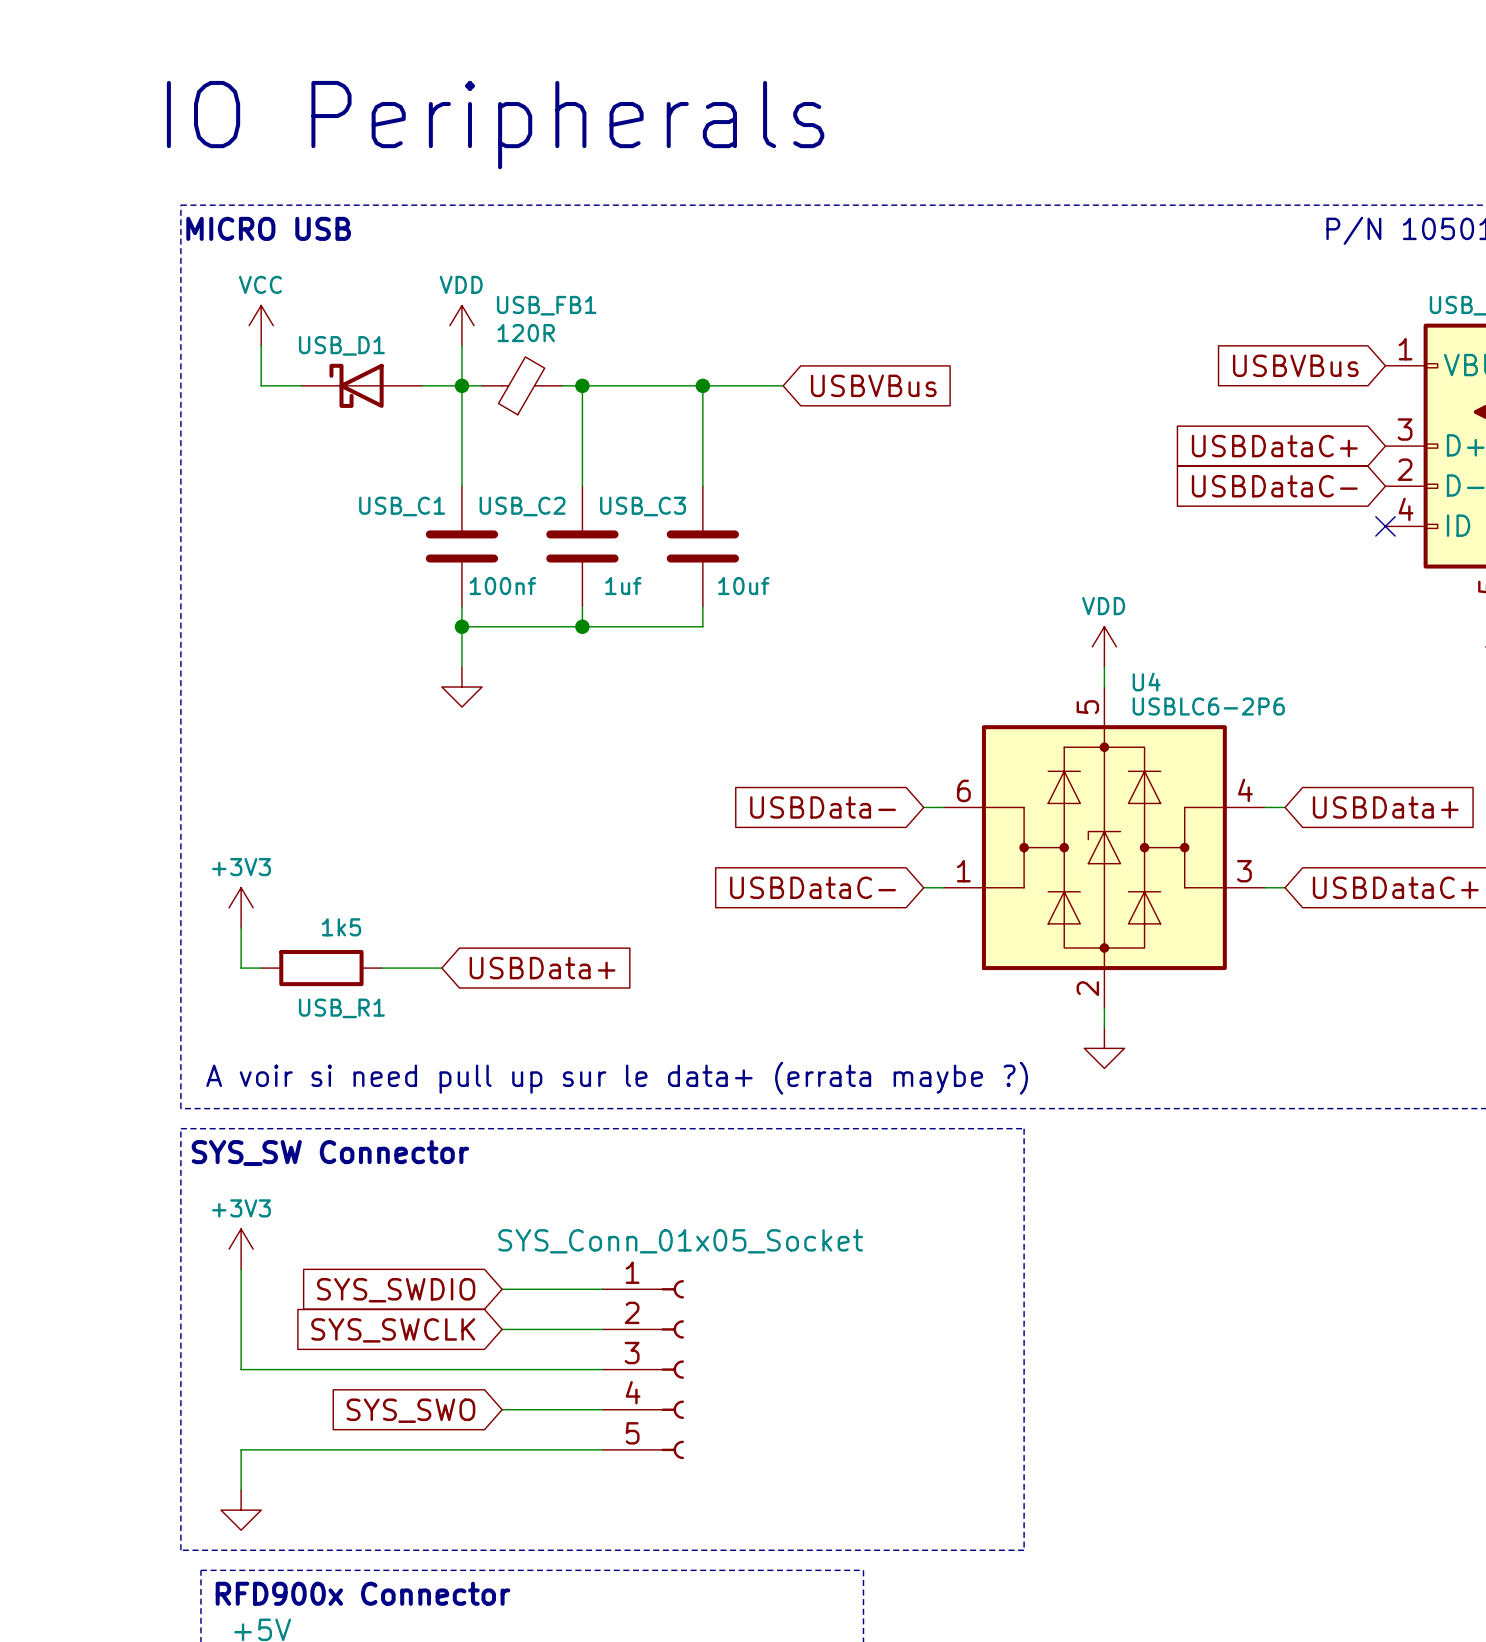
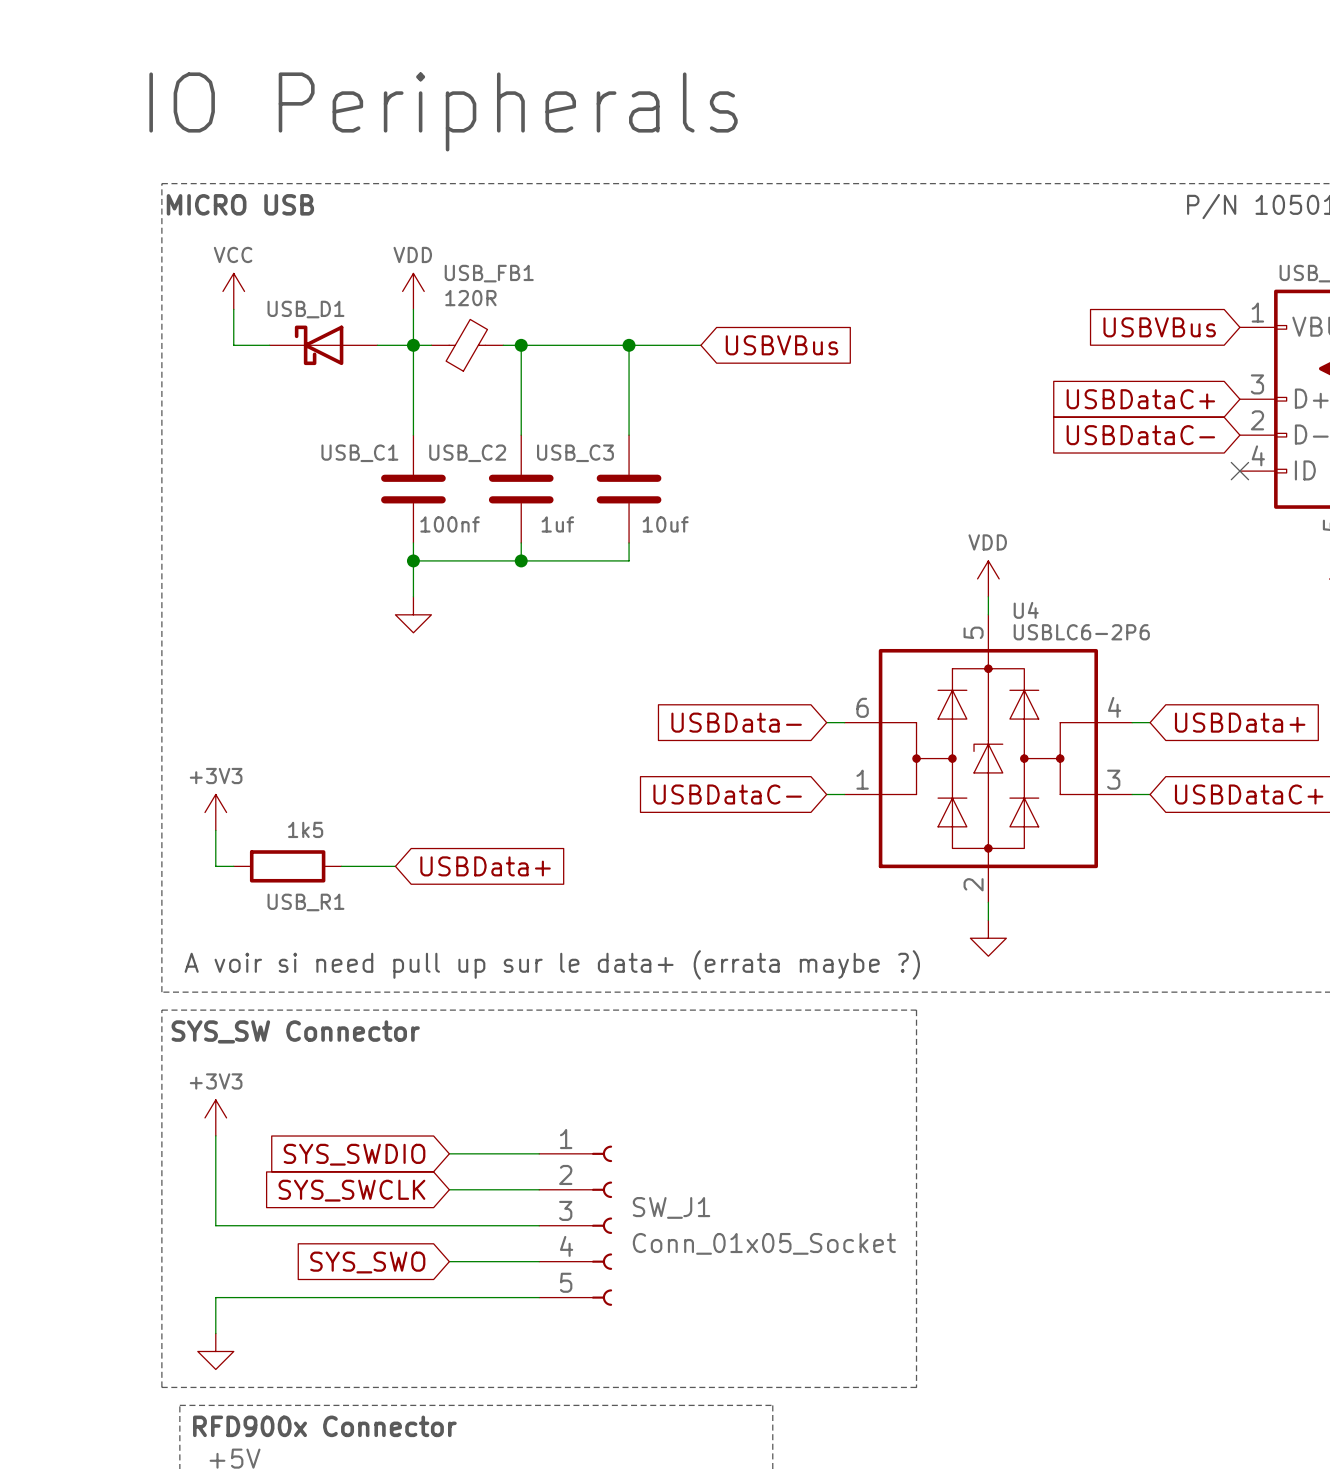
SW_J1 value: SYS_Conn_01x05_Socket (680, 1241) -> Conn_01x05_Socket (764, 1243)
SW_J1 name: none -> SW_J1 (671, 1207)

